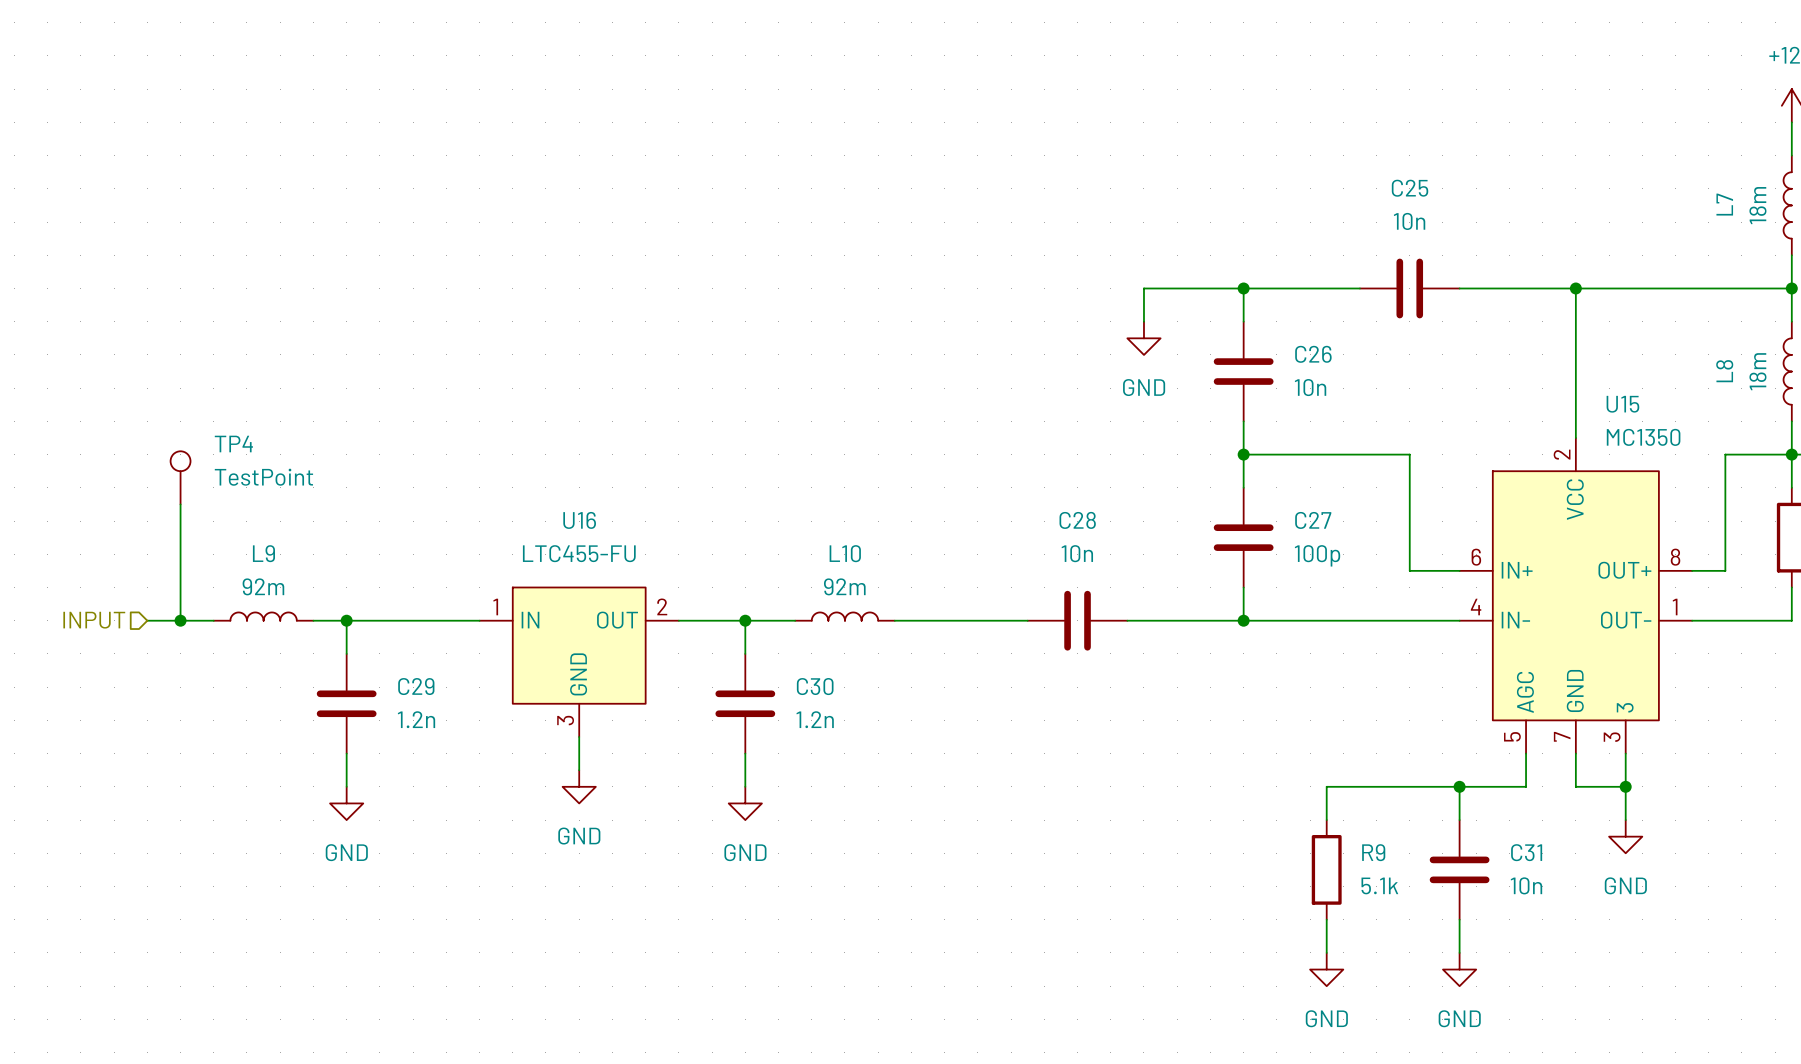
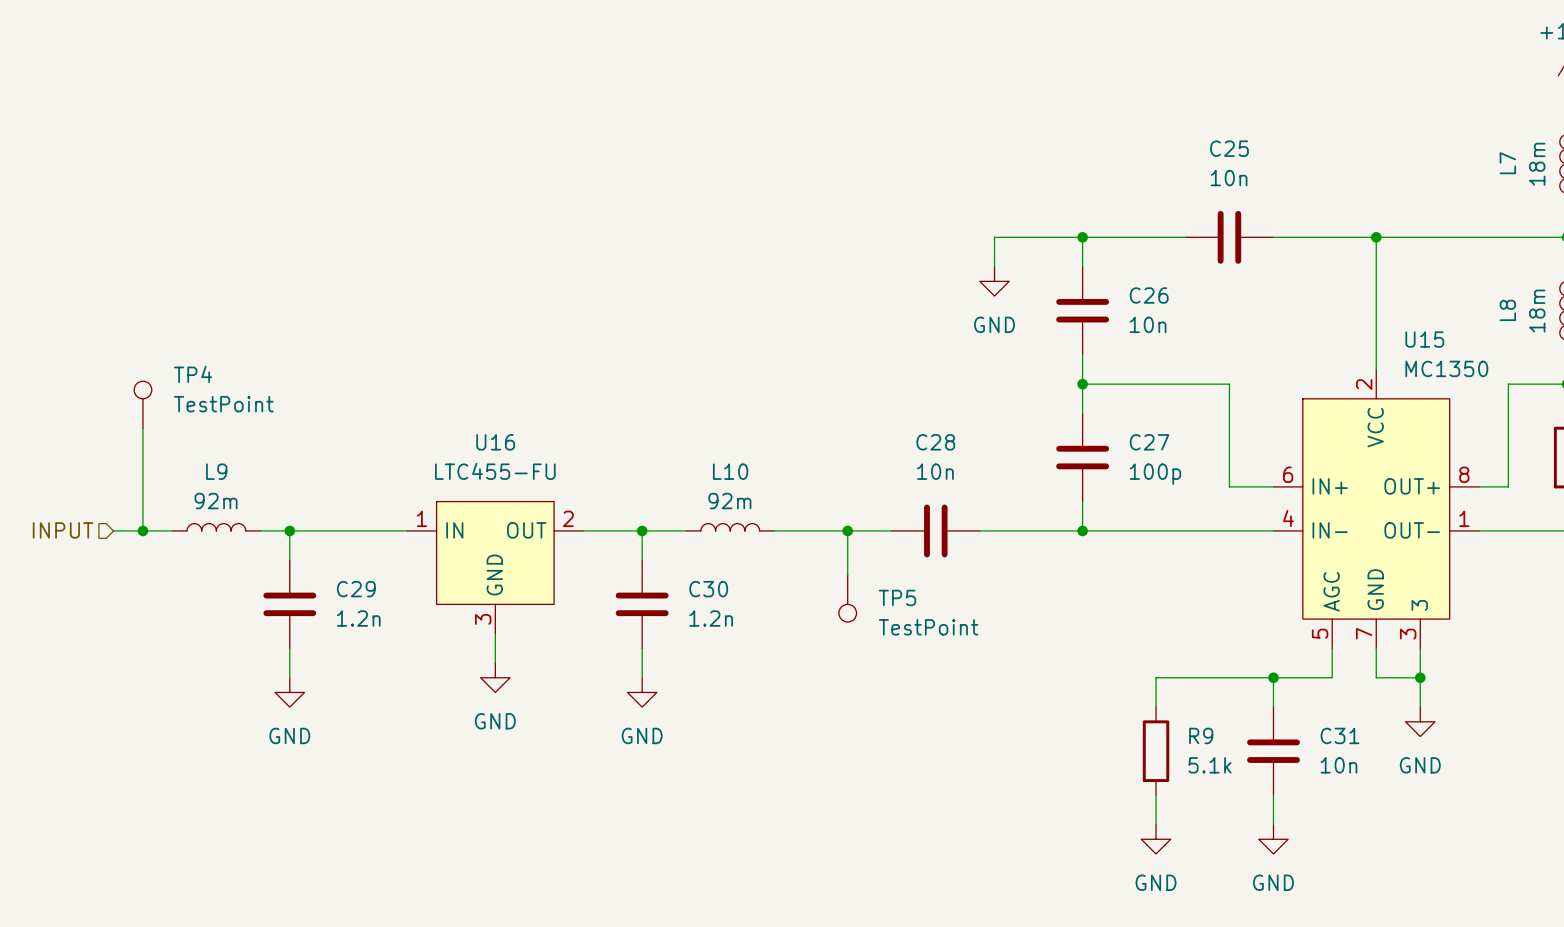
wire: none -> (847, 530) (847, 575)
junction: none -> (847, 530)
TP5: none -> TestPoint (847, 598)

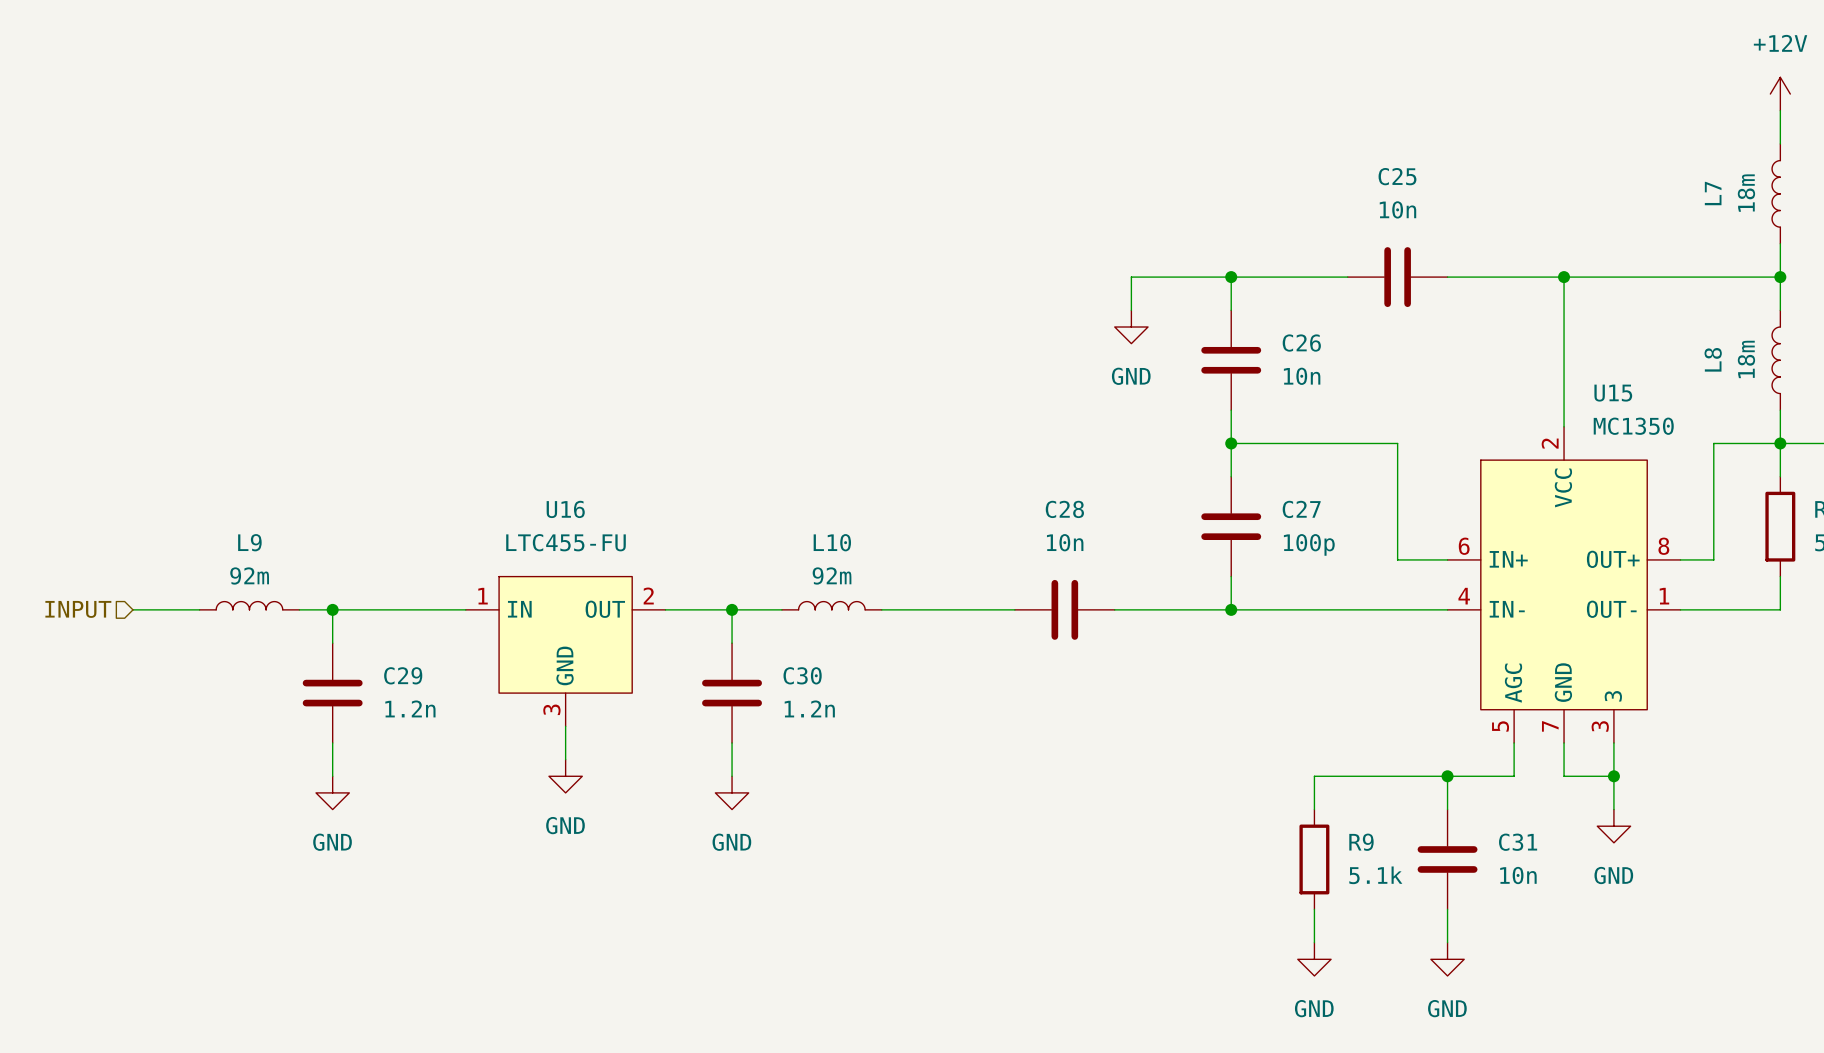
TP4: TestPoint (142, 404) -> none
wire: (142, 428) (142, 530) -> none
junction: (142, 530) -> none
wire: (847, 530) (847, 575) -> none
junction: (847, 530) -> none
TP5: TestPoint (847, 598) -> none

